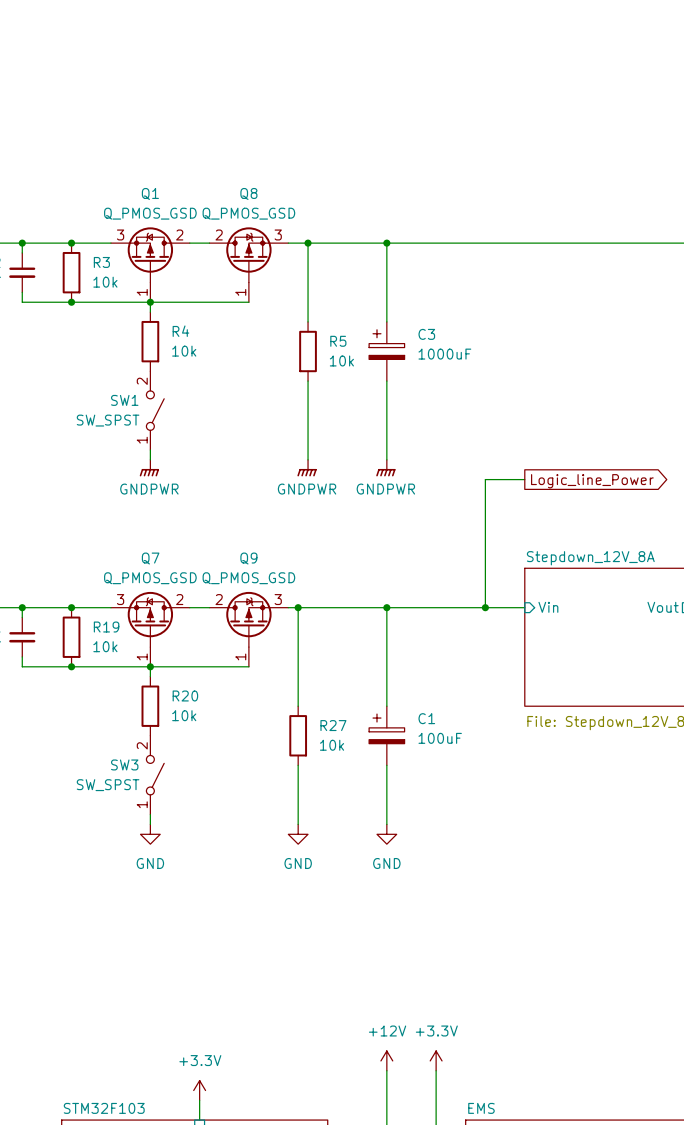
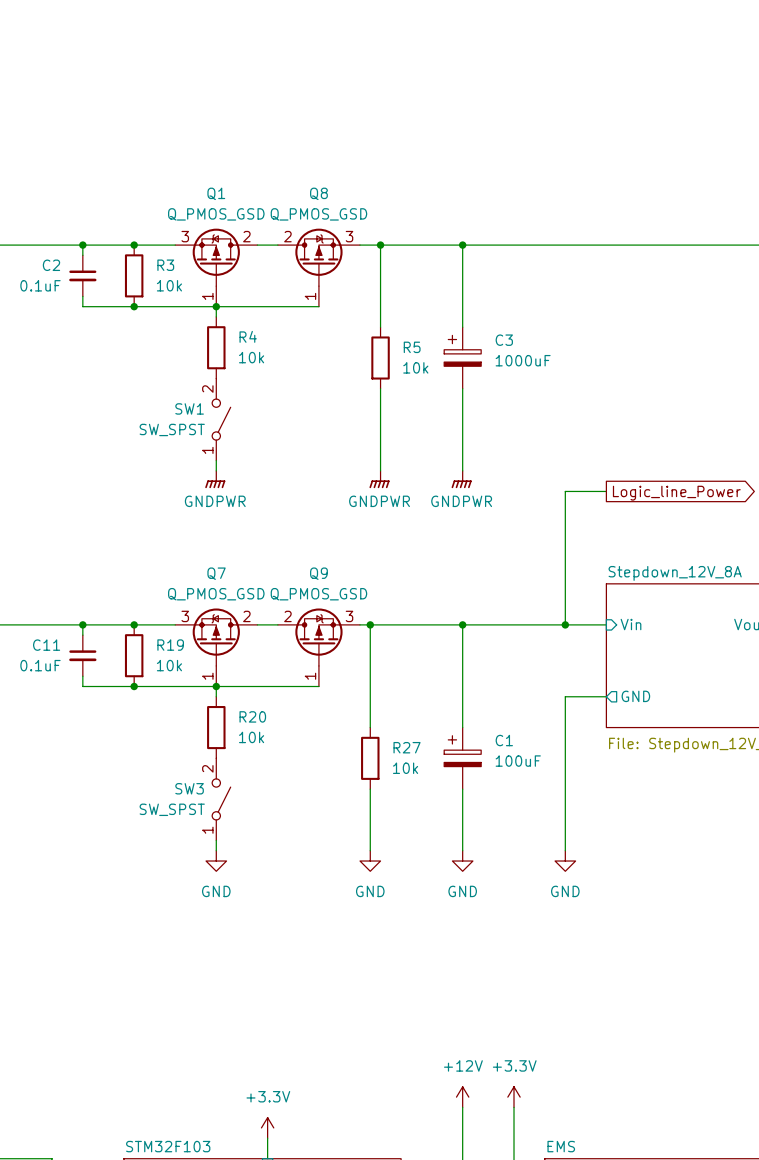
wire: none -> (606, 696) (565, 696) (565, 850)
sheet pin: none -> GND (635, 696)
power symbol: none -> GND (565, 861)

